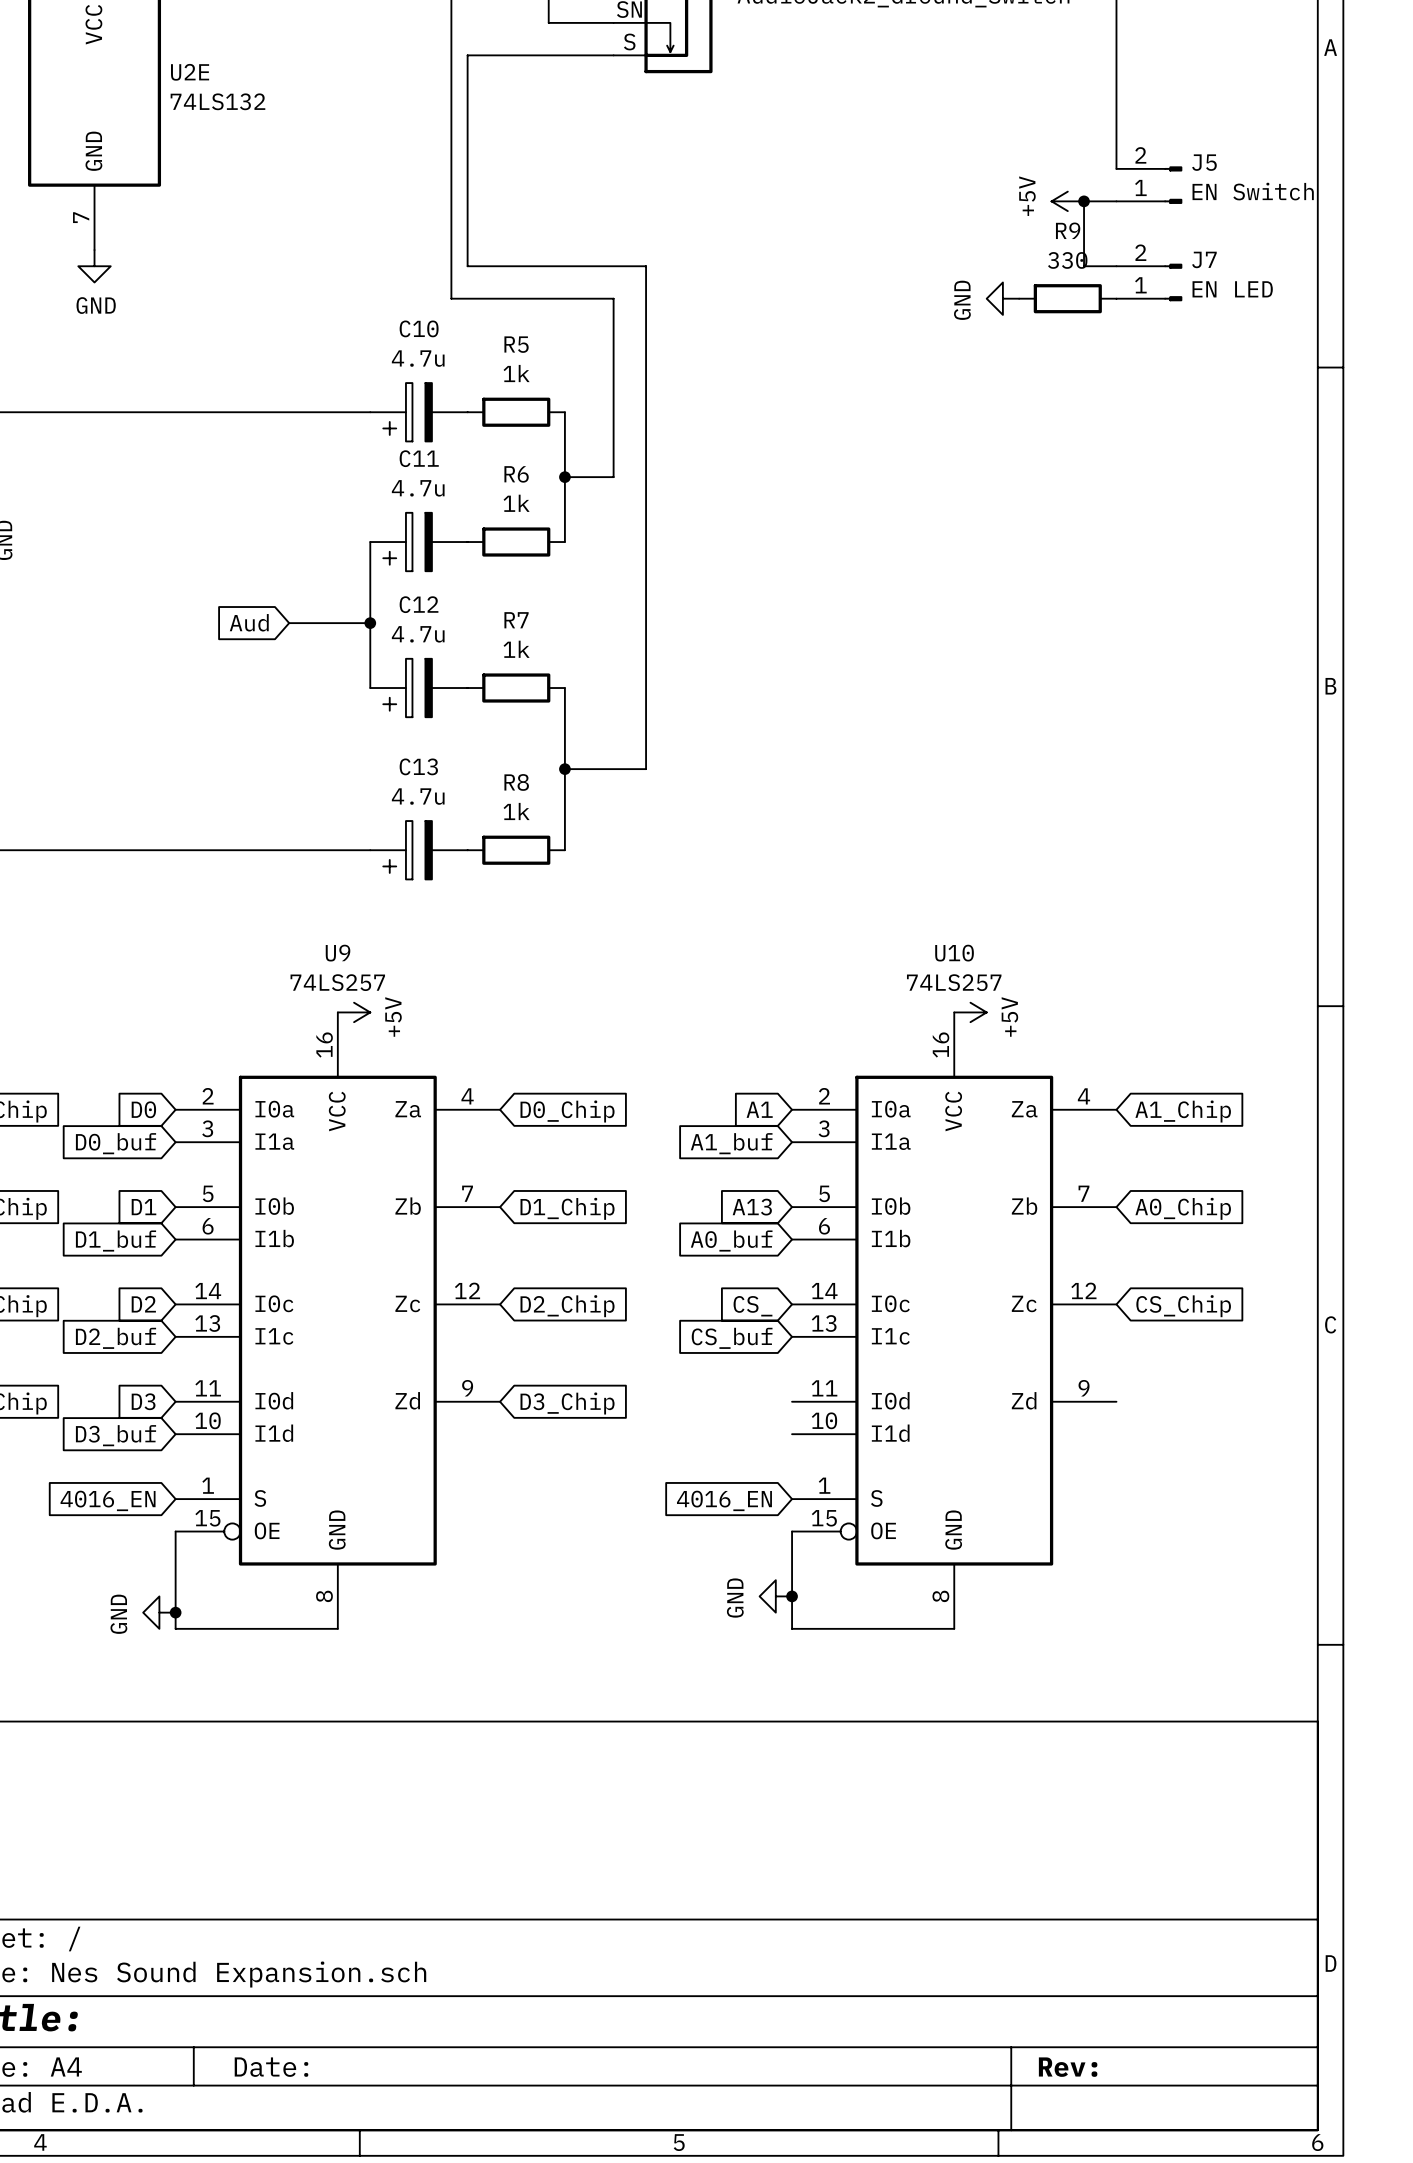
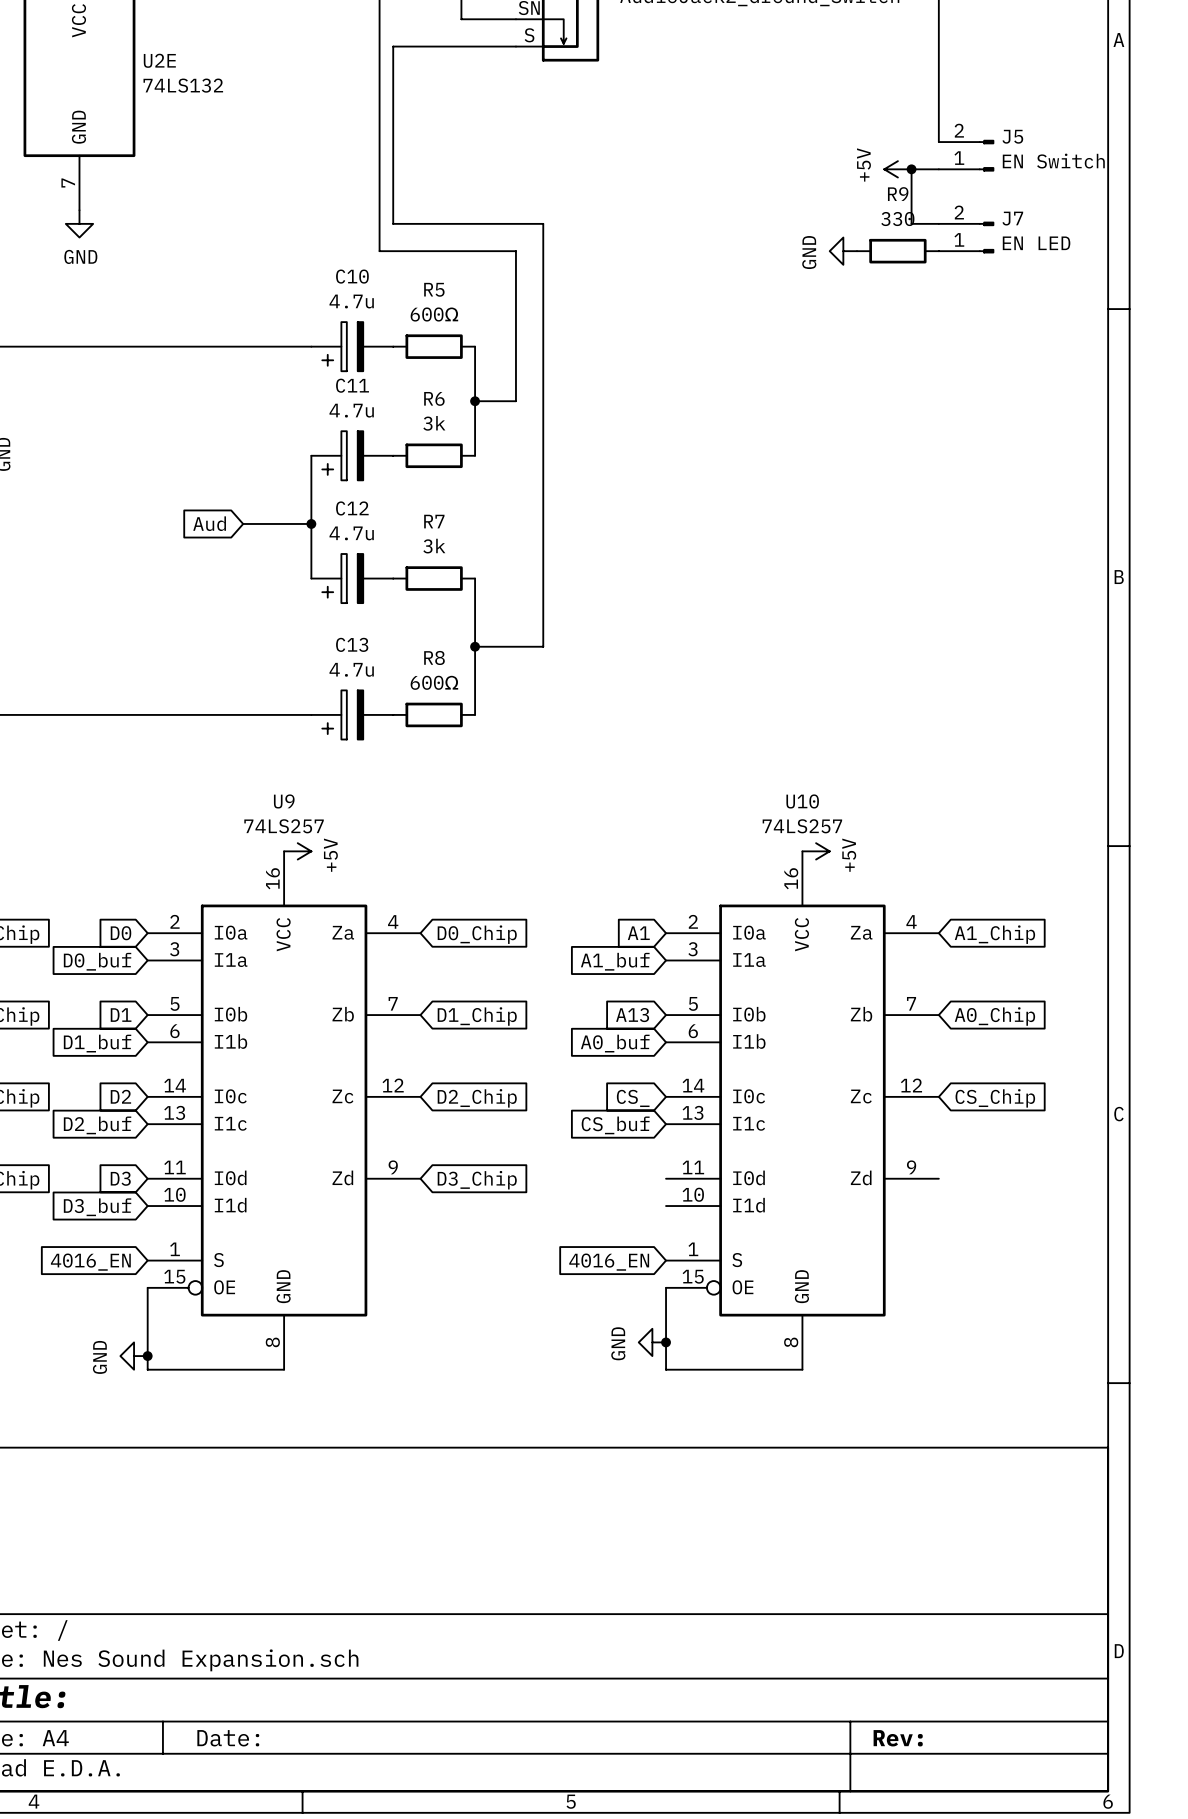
R5 value: 1k (516, 373) -> 600Ω (434, 314)
R6 value: 1k (516, 503) -> 3k (434, 423)
R7 value: 1k (516, 649) -> 3k (434, 546)
R8 value: 1k (516, 811) -> 600Ω (434, 682)

